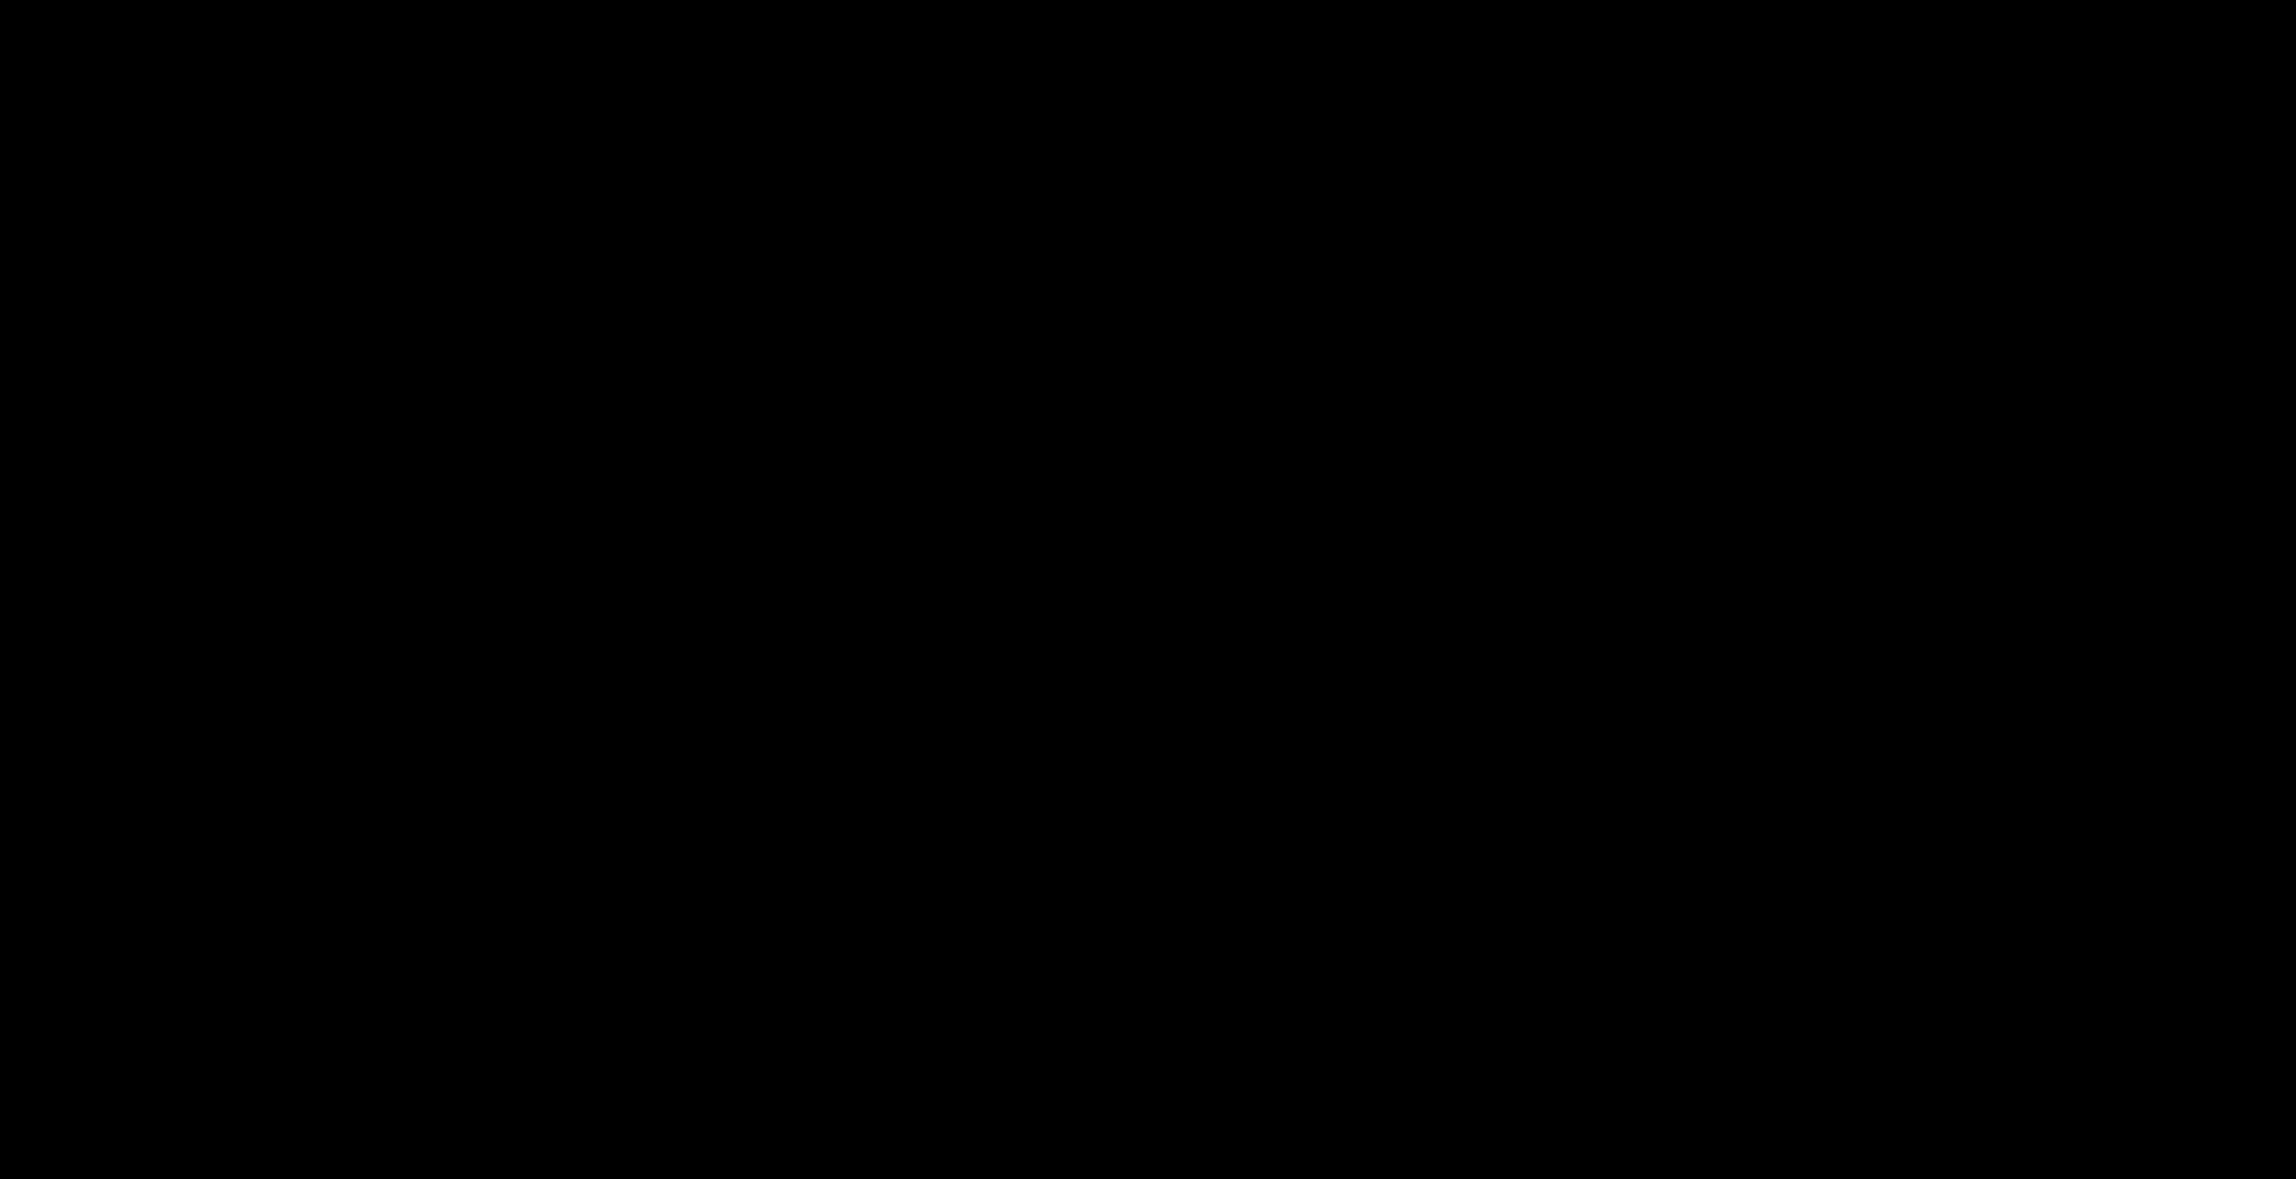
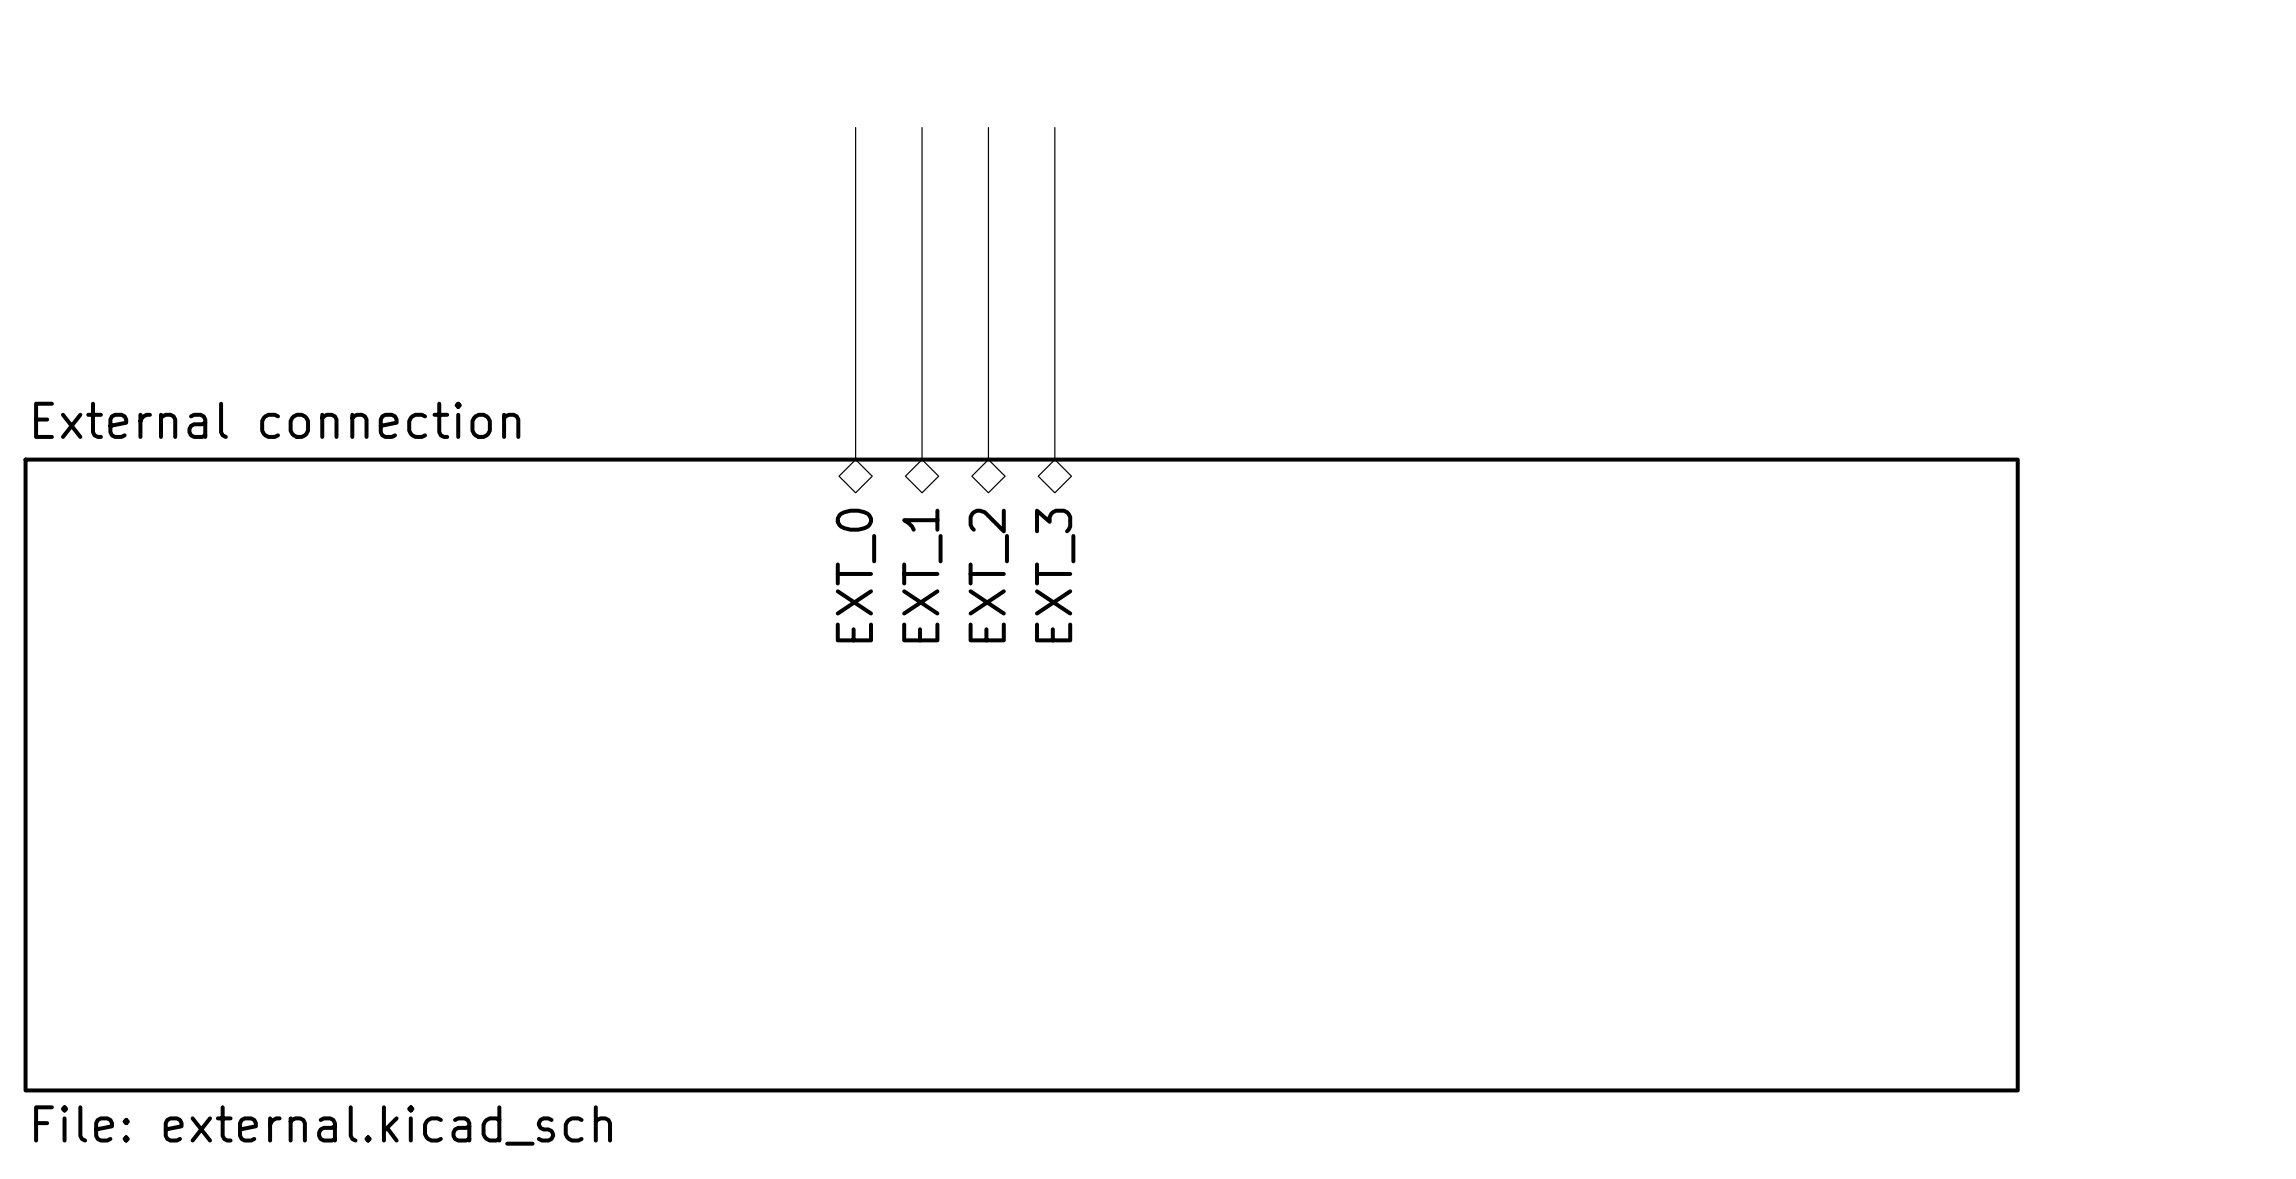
wire: none -> (855, 127) (855, 459)
wire: none -> (922, 127) (922, 459)
wire: none -> (988, 127) (988, 459)
wire: none -> (1054, 127) (1054, 459)
sheet pin: none -> EXT_0 (855, 575)
sheet pin: none -> EXT_1 (922, 575)
sheet pin: none -> EXT_2 (988, 575)
sheet pin: none -> EXT_3 (1055, 575)
sheet External connection: none -> File: external.kicad_sch (1021, 775)

